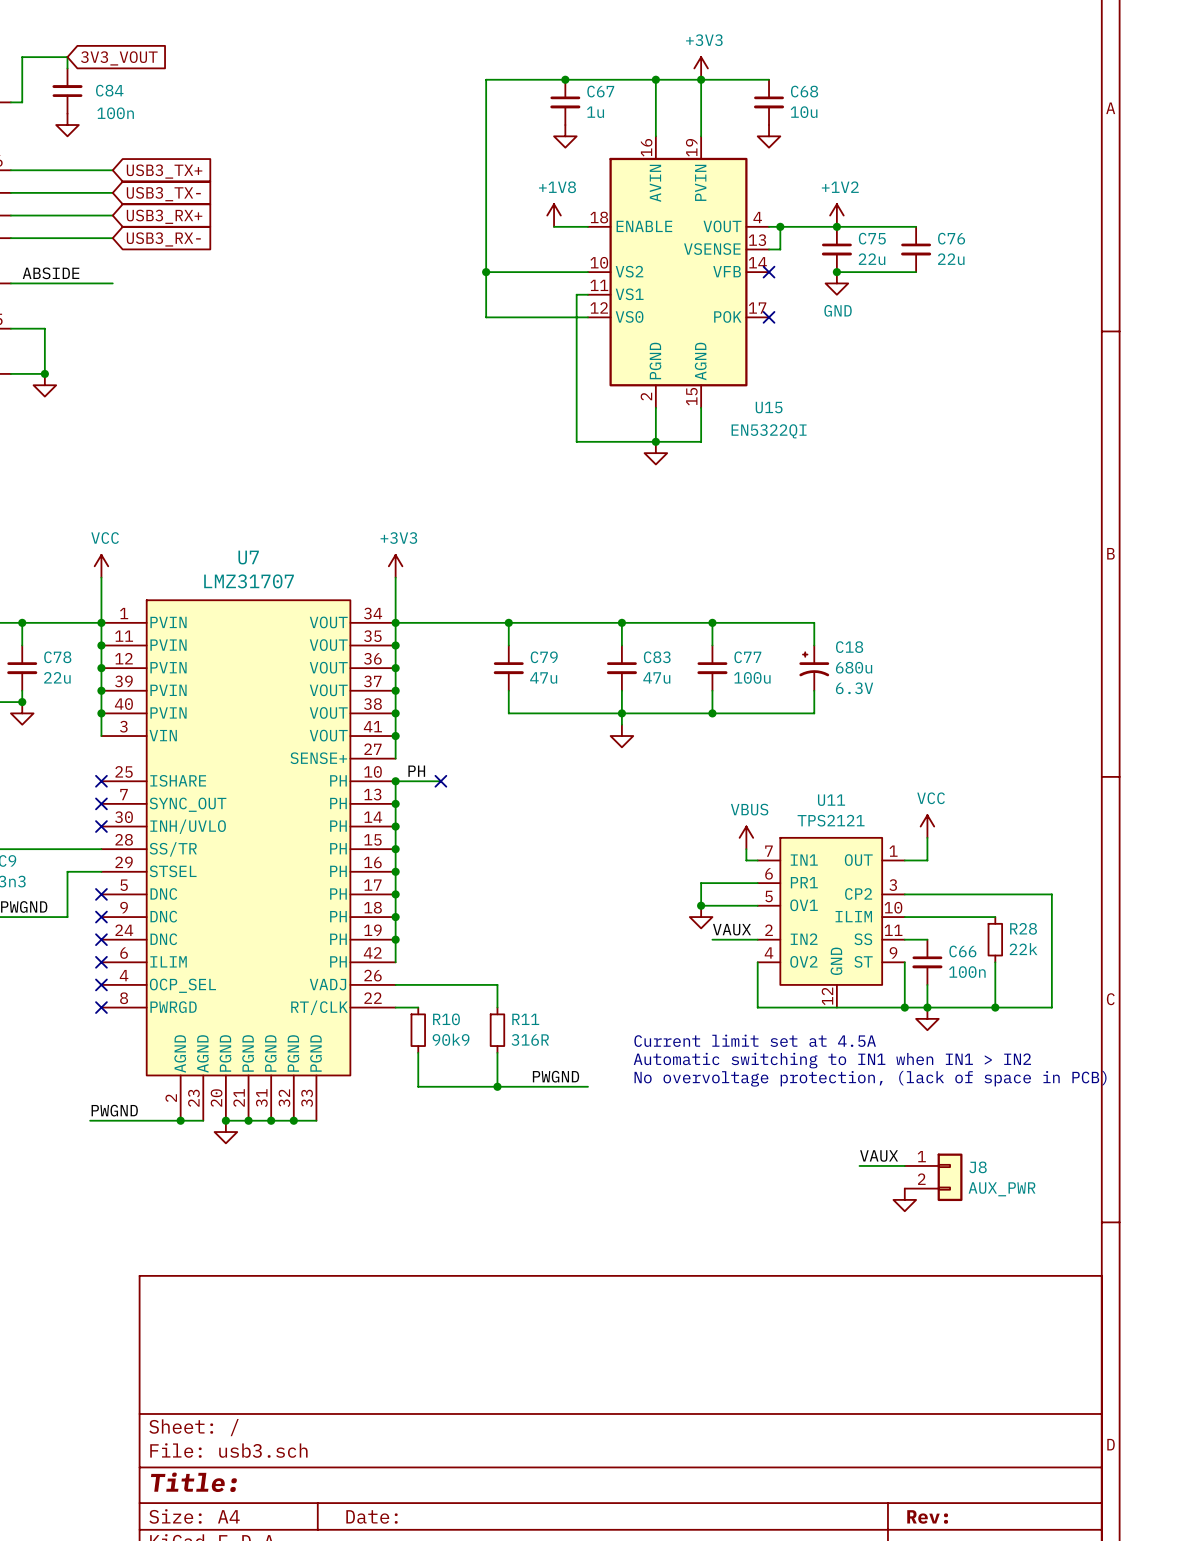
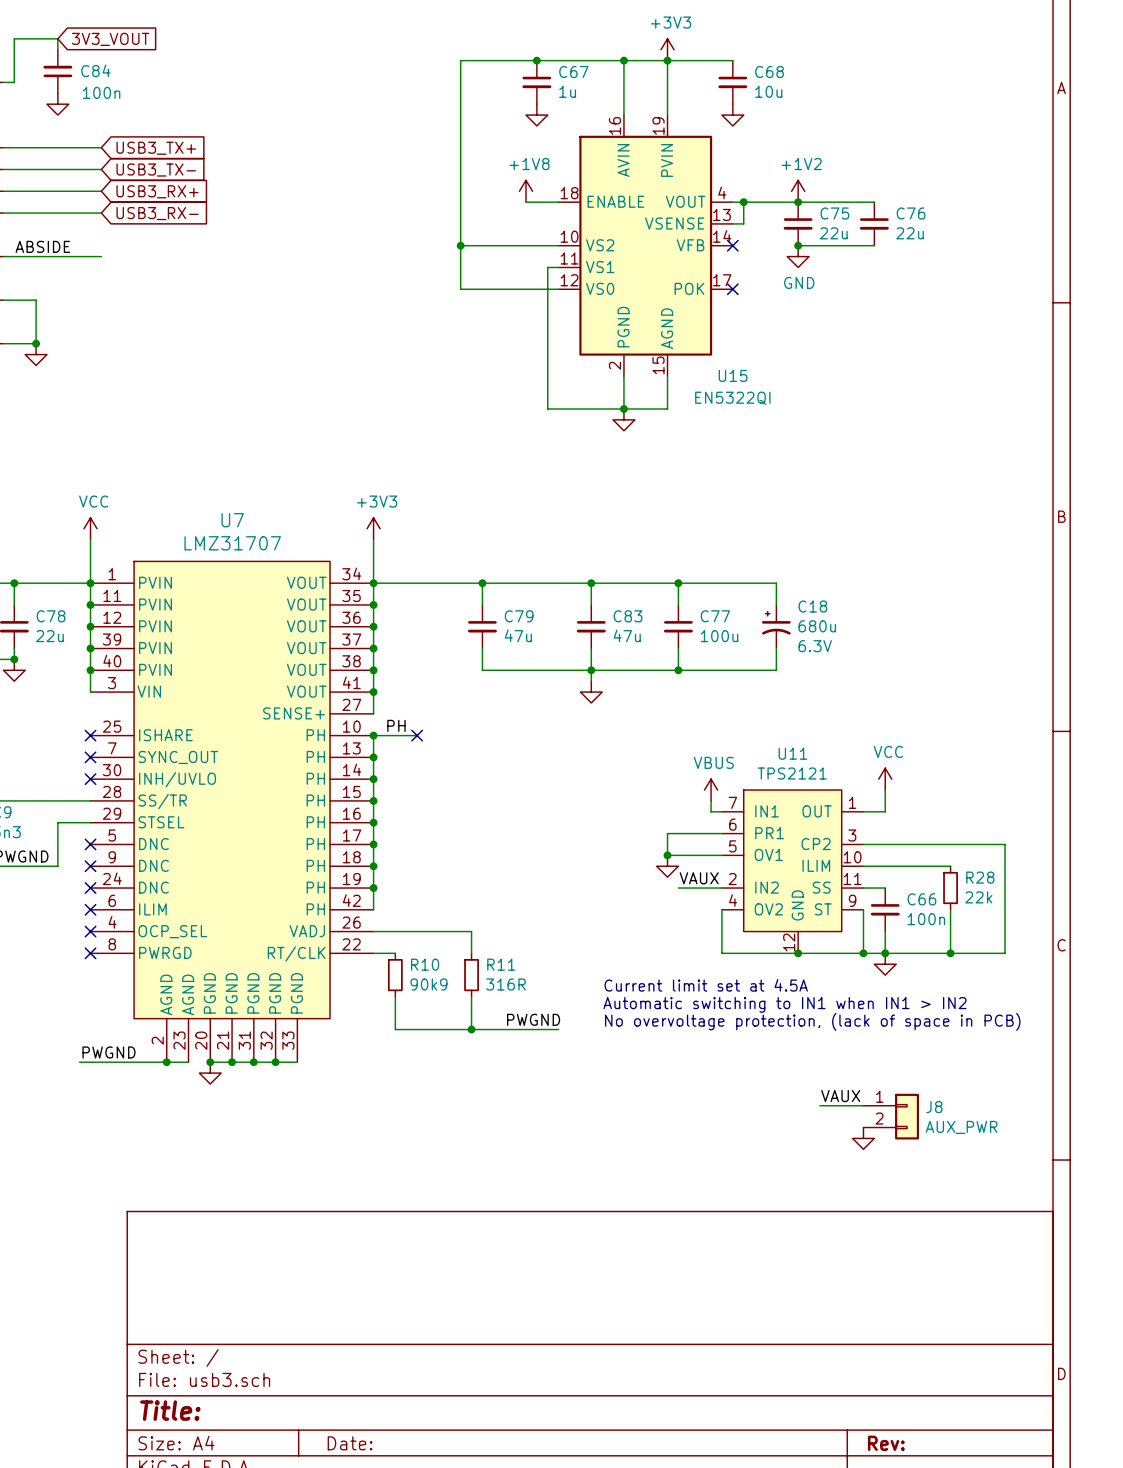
junction: none -> (798, 953)

